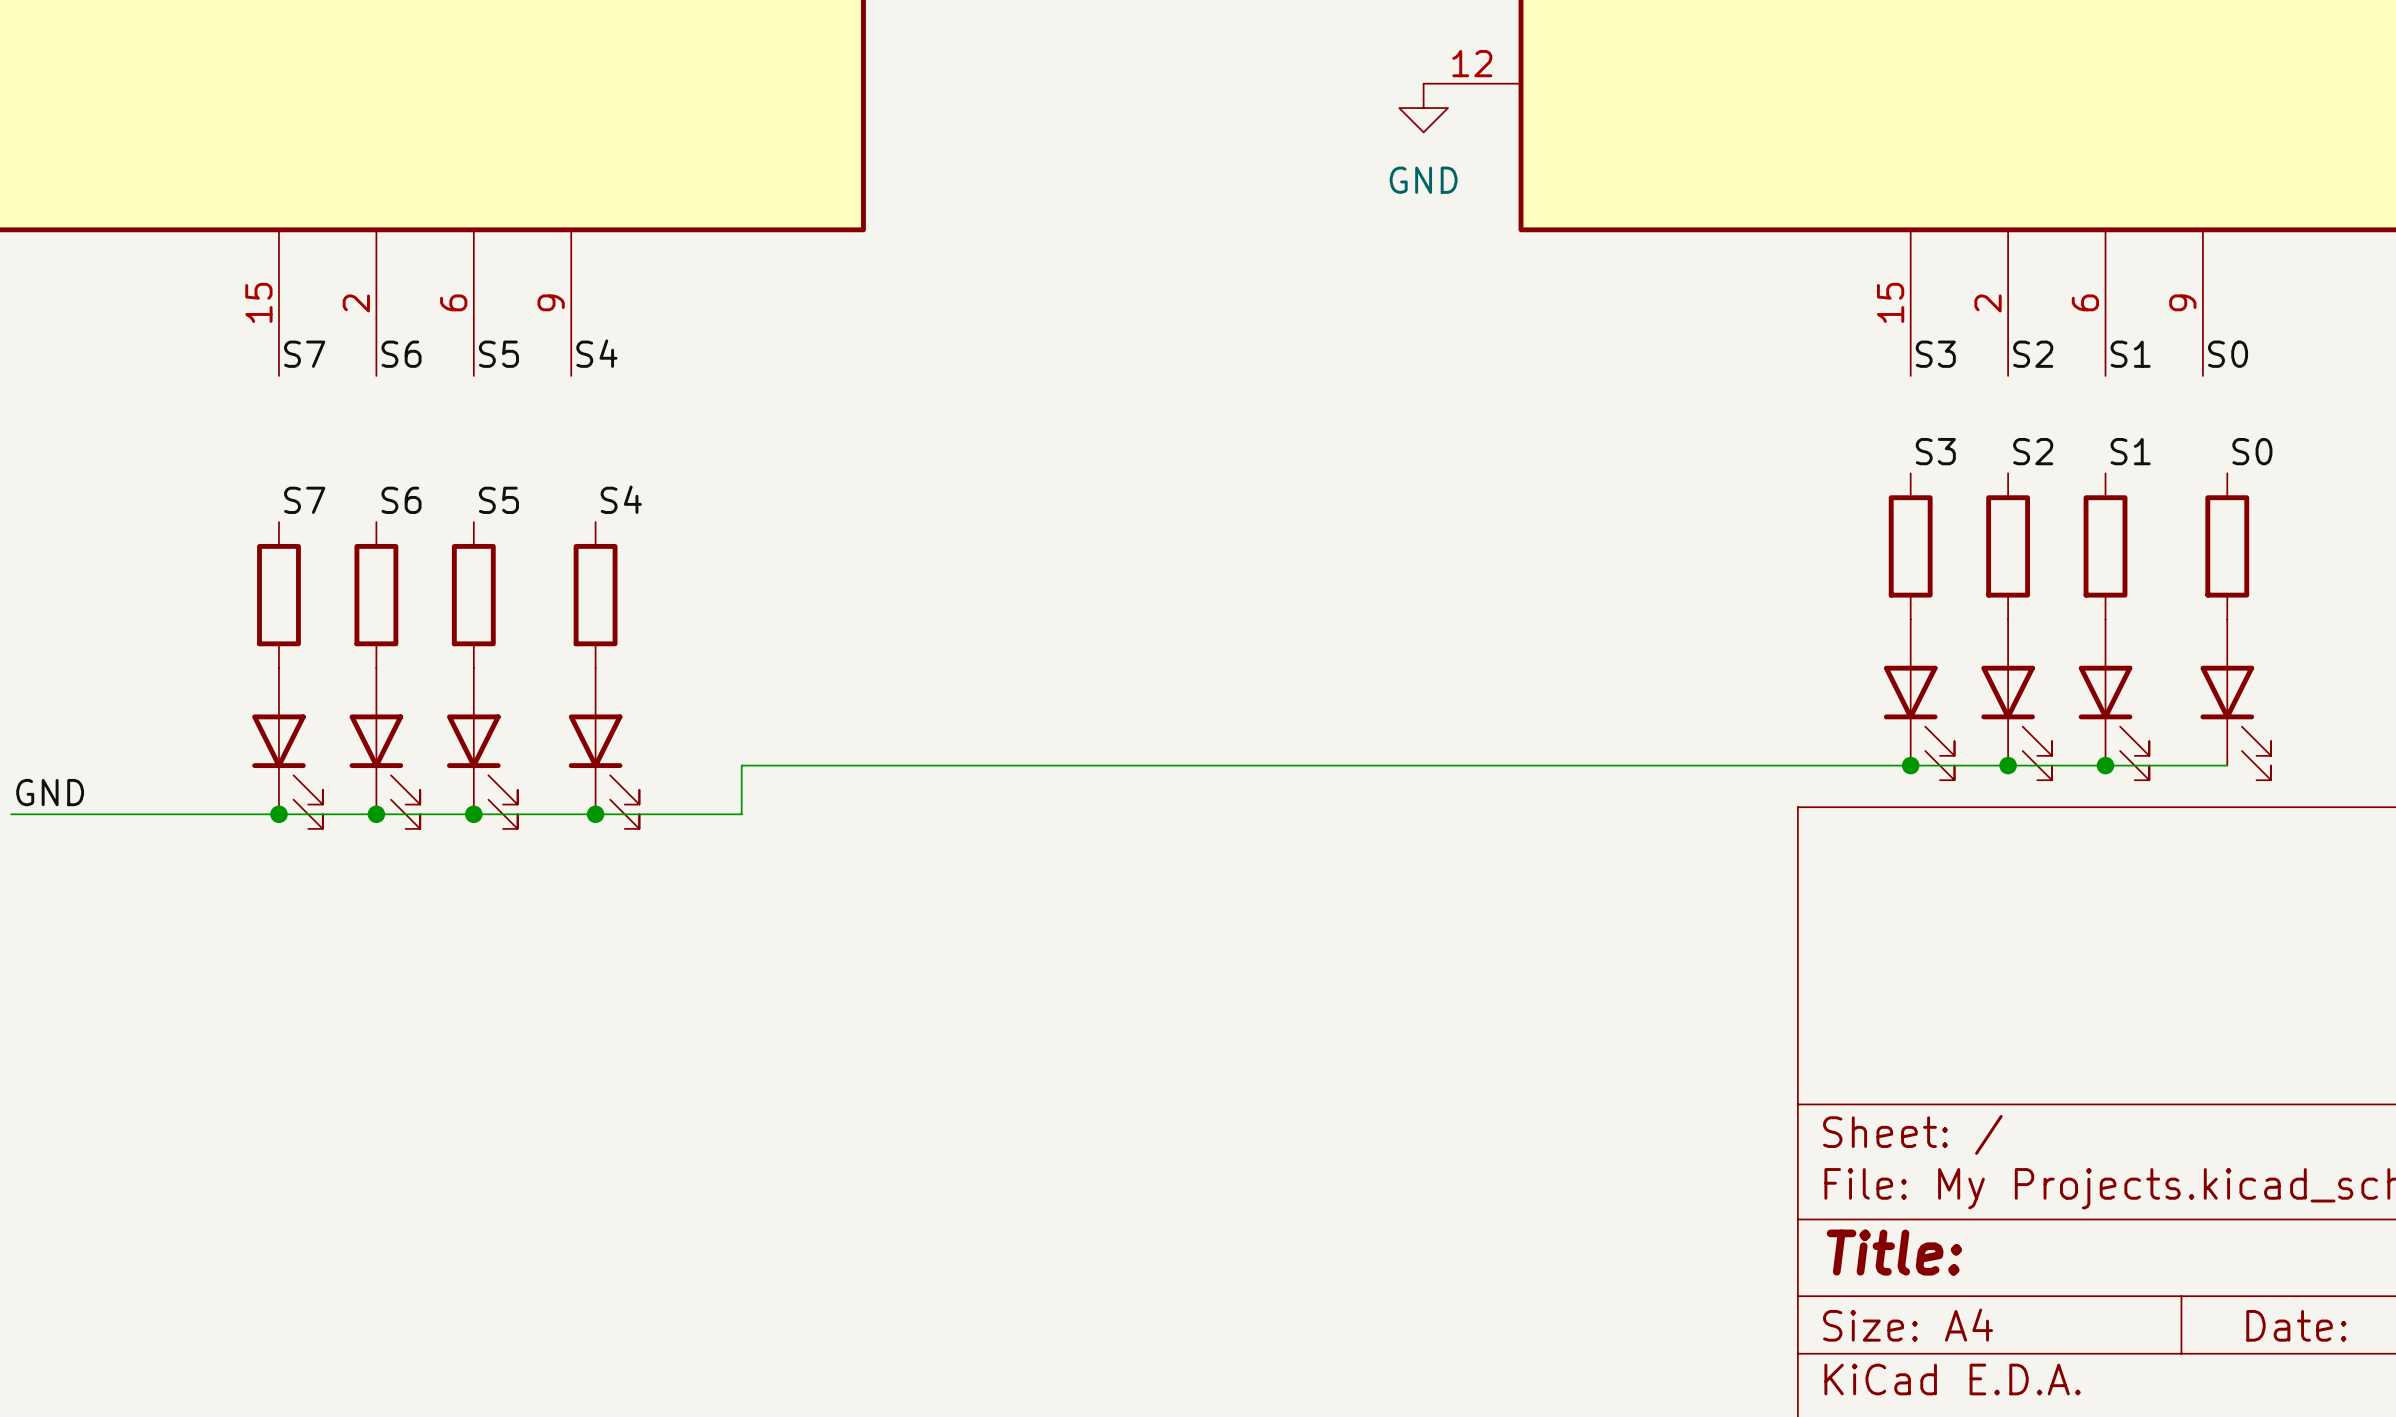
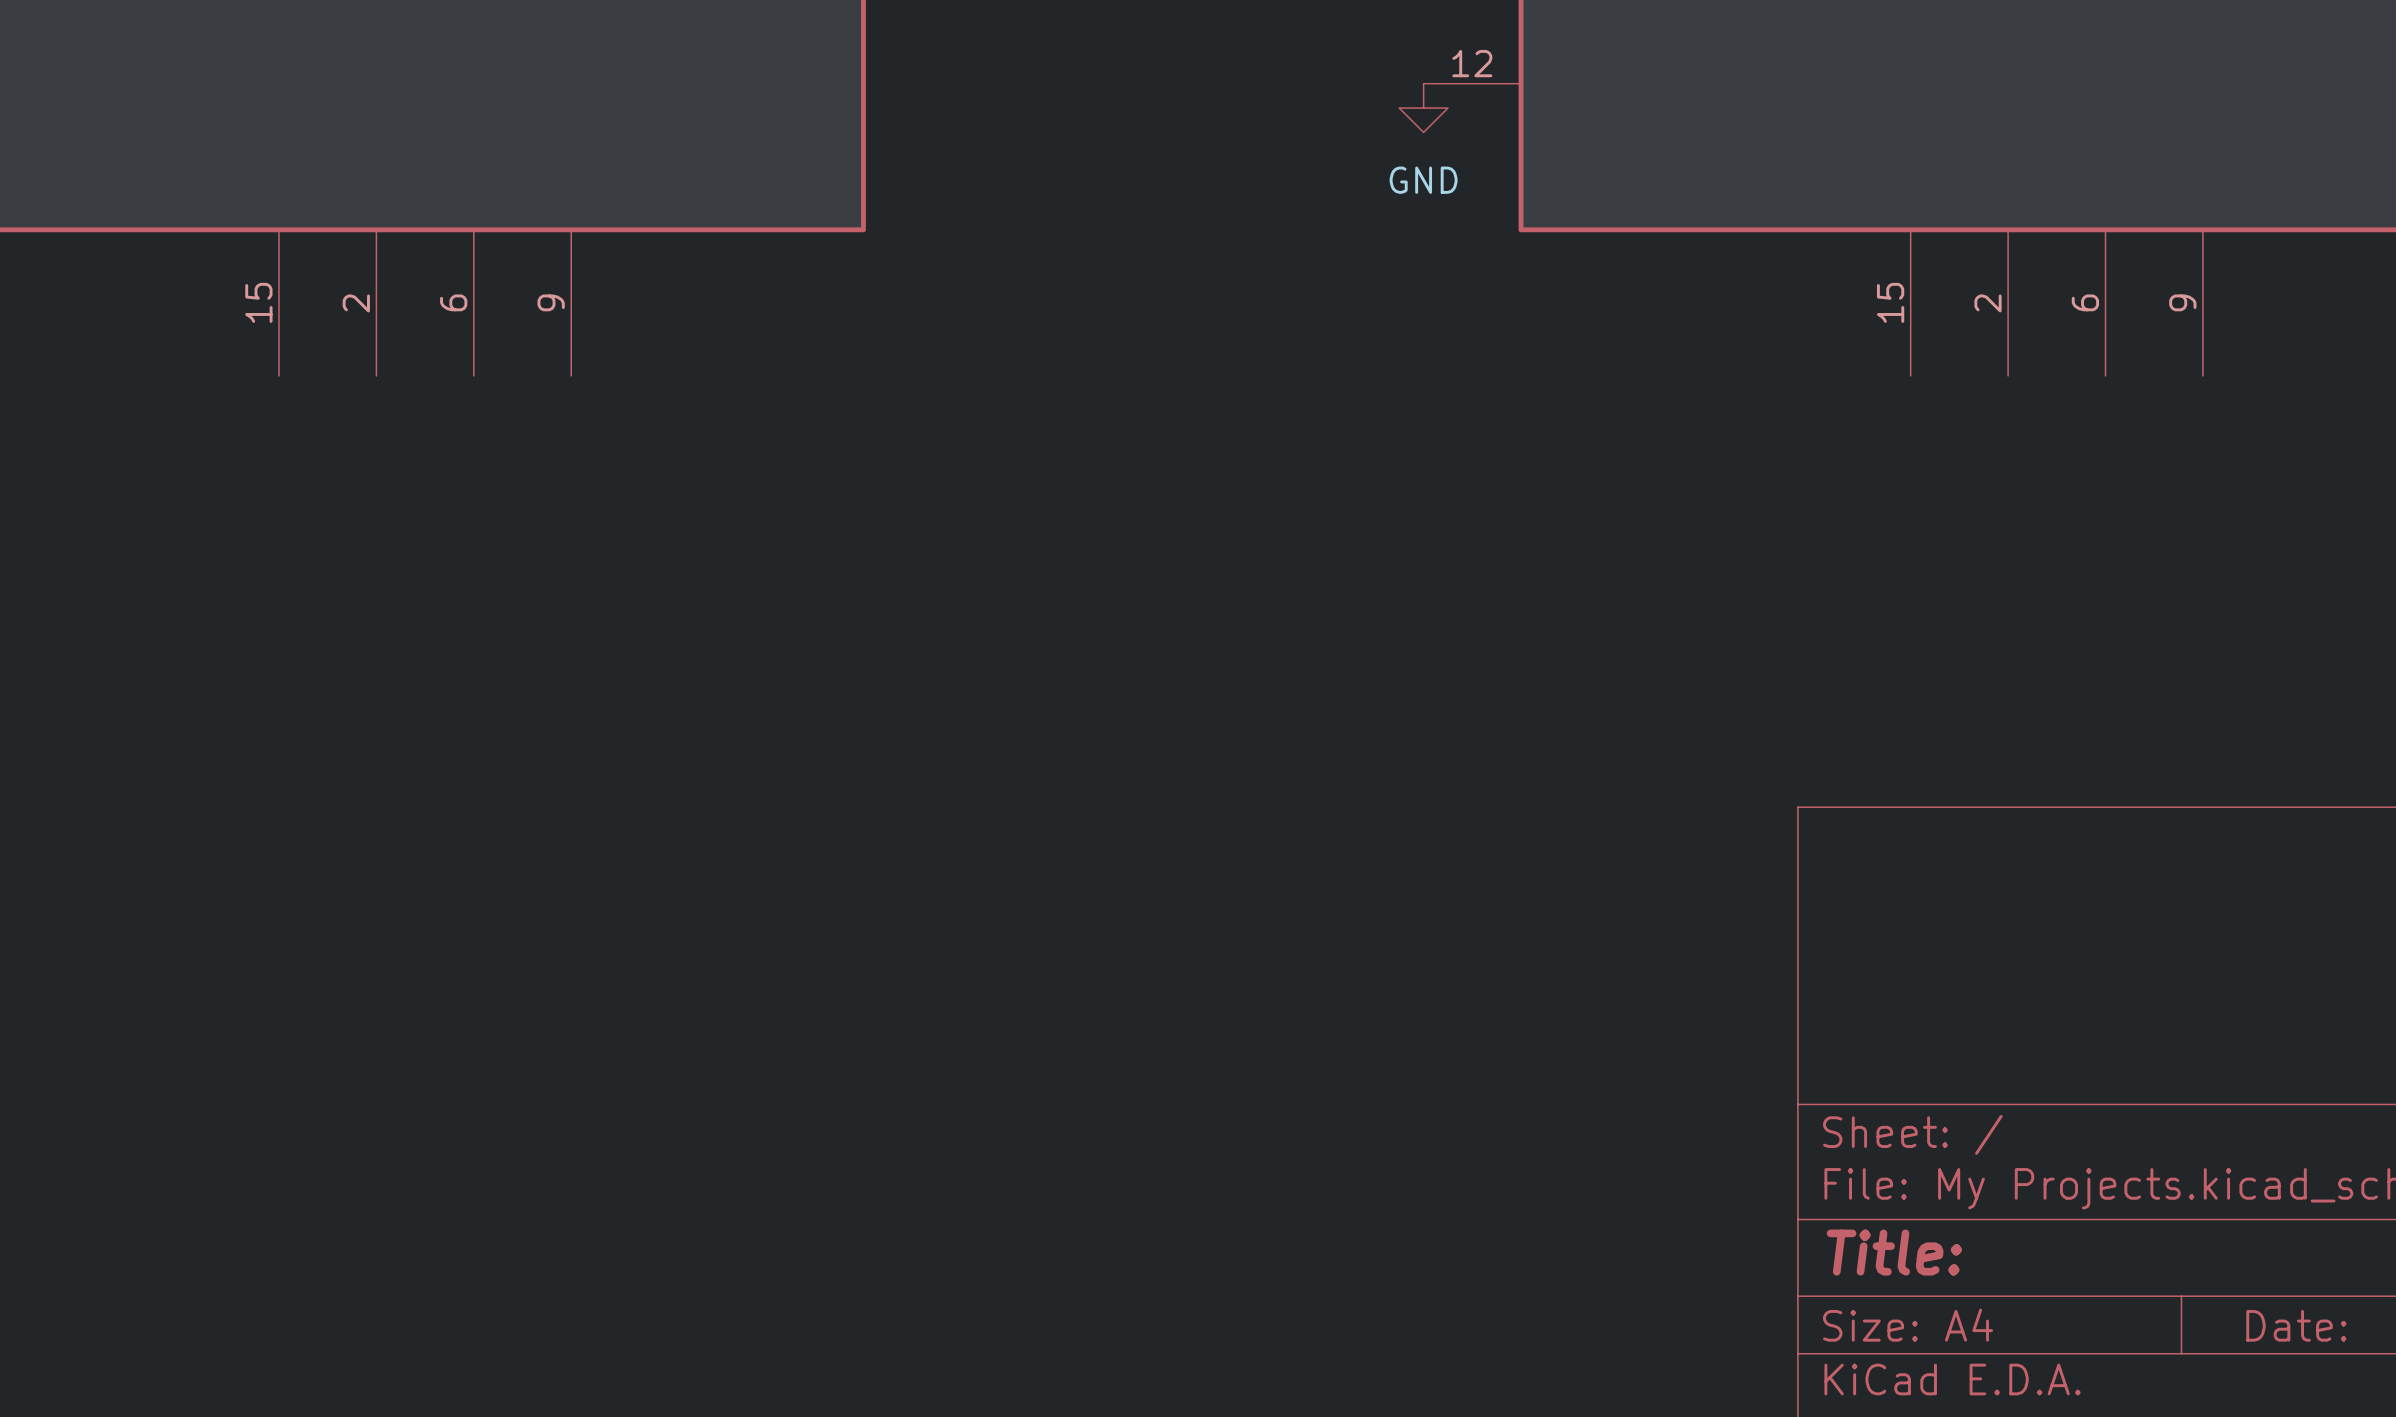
label: S4 (596, 353) -> none
label: S7 (304, 354) -> none
label: S6 (401, 354) -> none
label: S5 (498, 354) -> none
label: S3 (1935, 354) -> none
label: S2 (2033, 354) -> none
label: S1 (2130, 354) -> none
label: S0 (2228, 354) -> none
label: S3 (1935, 451) -> none
label: S2 (2033, 451) -> none
label: S1 (2130, 451) -> none
label: S0 (2252, 451) -> none
label: S4 (621, 499) -> none
label: S7 (304, 500) -> none
label: S6 (401, 500) -> none
label: S5 (498, 500) -> none
part: (1910, 546) -> none
part: (2008, 546) -> none
part: (2105, 546) -> none
part: (2227, 546) -> none
part: (278, 595) -> none
part: (376, 595) -> none
part: (473, 595) -> none
part: (595, 595) -> none
part: (1919, 699) -> none
part: (2016, 699) -> none
part: (2114, 699) -> none
part: (2235, 699) -> none
part: (287, 748) -> none
part: (384, 748) -> none
part: (482, 748) -> none
part: (604, 748) -> none
junction: (1910, 765) -> none
junction: (2008, 765) -> none
junction: (2105, 765) -> none
wire: (2227, 765) (741, 765) (741, 814) (11, 814) -> none
label: GND (50, 792) -> none
junction: (278, 814) -> none
junction: (376, 814) -> none
junction: (473, 814) -> none
junction: (595, 814) -> none

